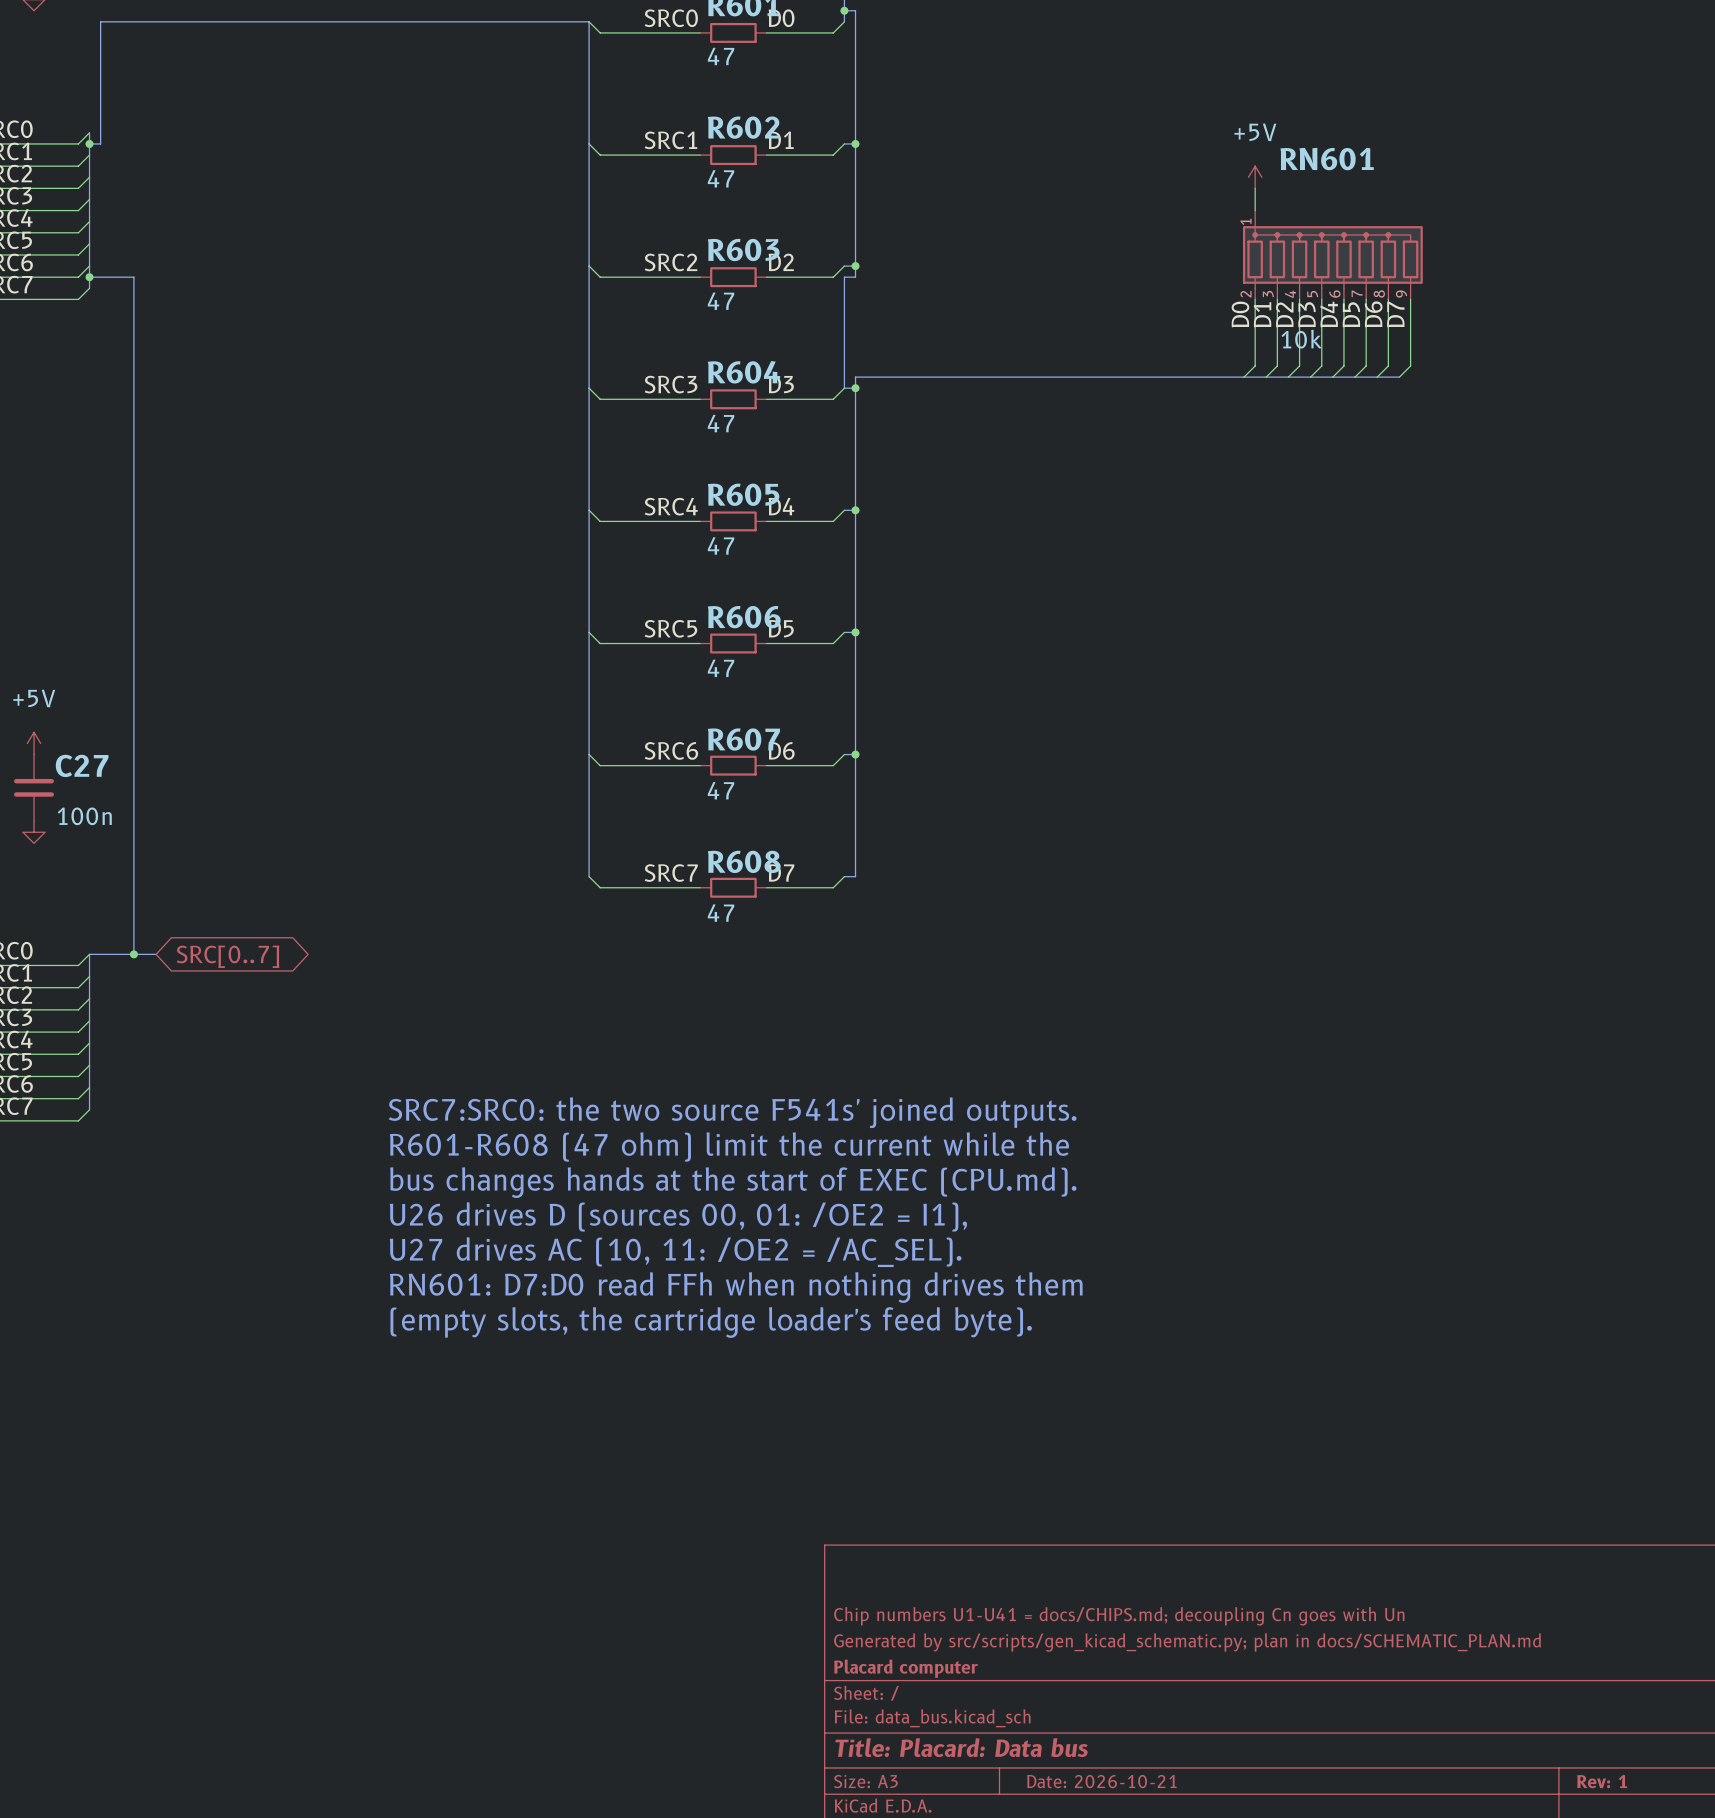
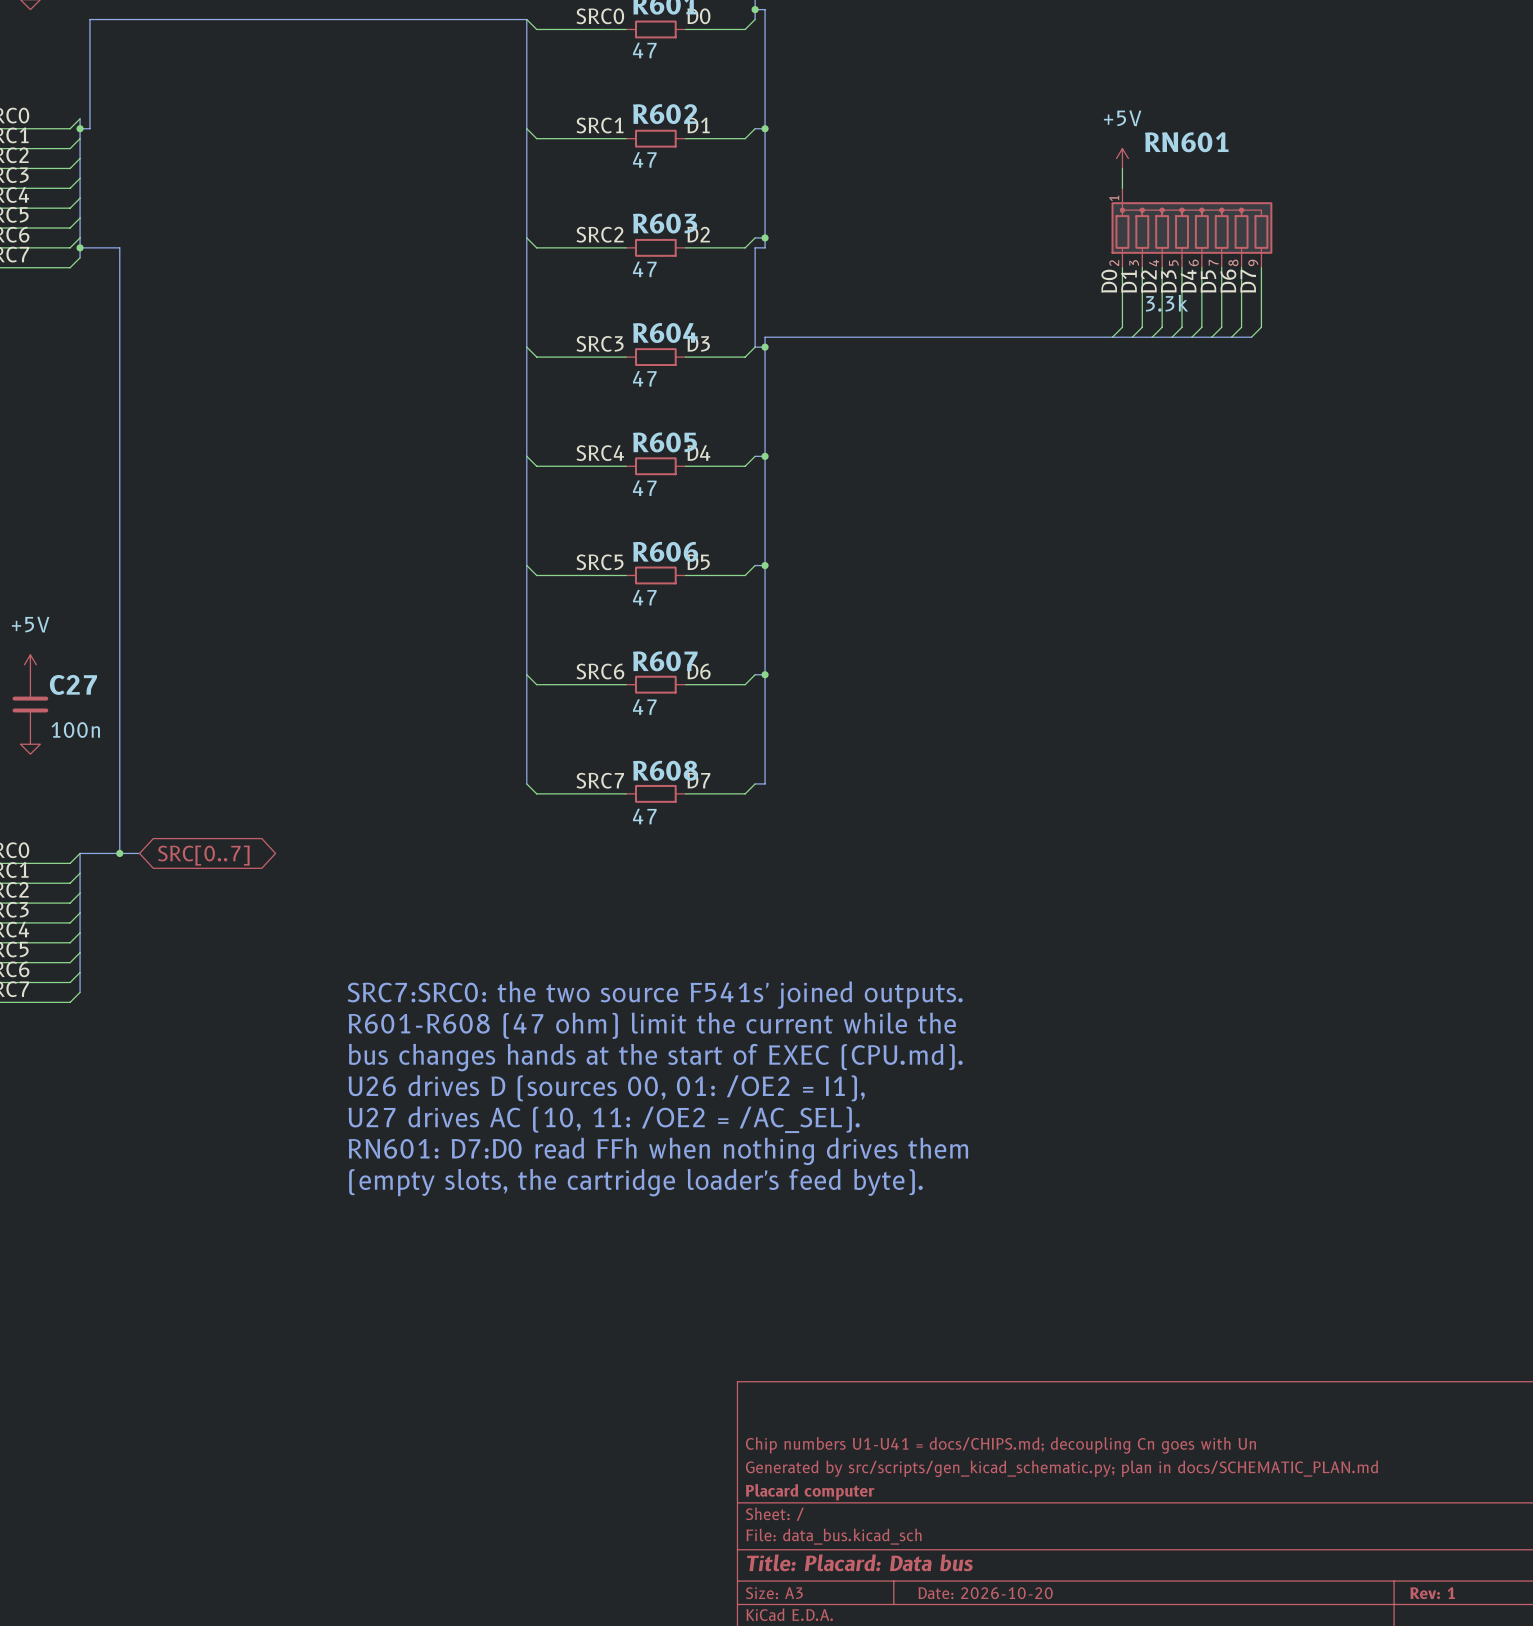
RN601 value: 10k (1301, 339) -> 3.3k (1167, 303)
title block: Date: 2026-10-21 (1101, 1781) -> Date: 2026-10-20 (985, 1593)

